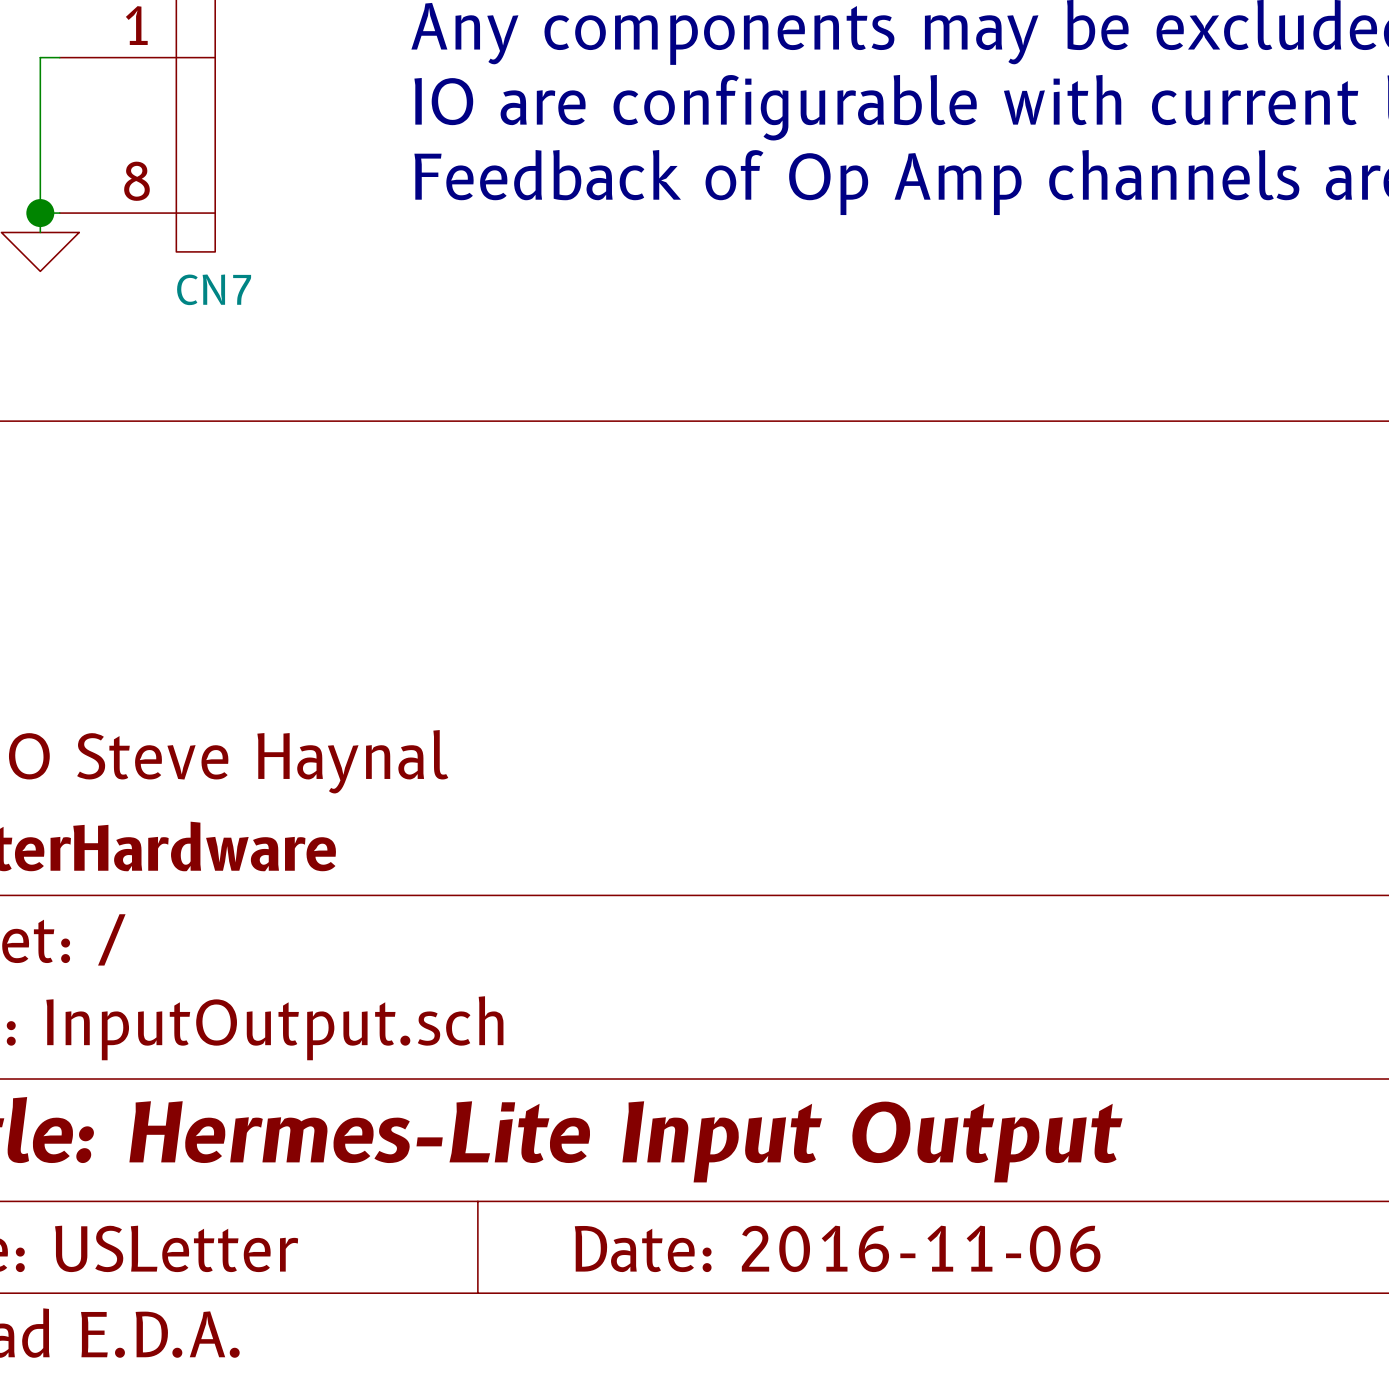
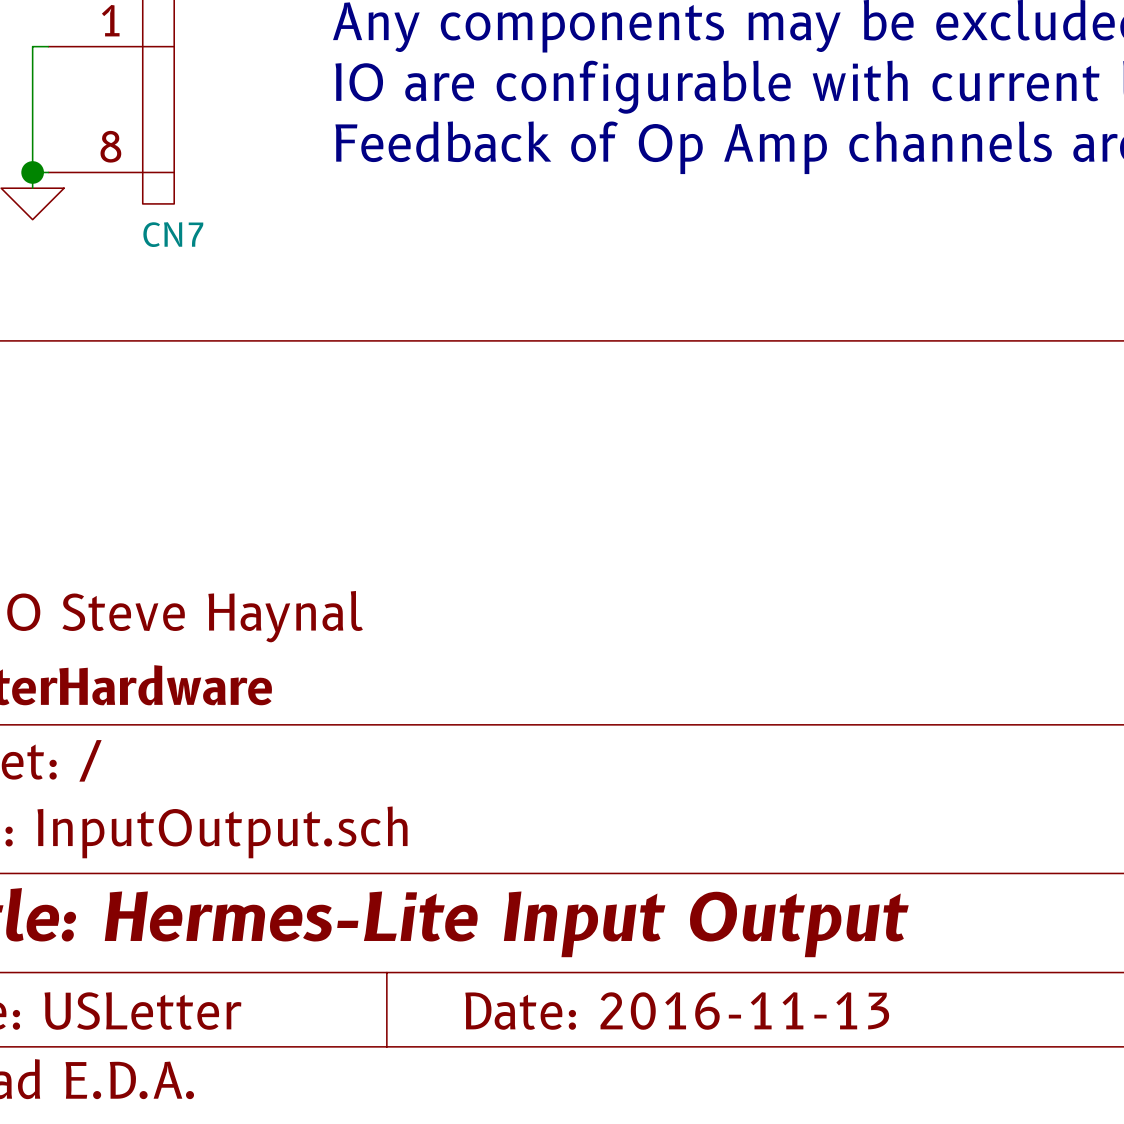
title block: Date: 2016-11-06 (837, 1248) -> Date: 2016-11-13 (677, 1011)

